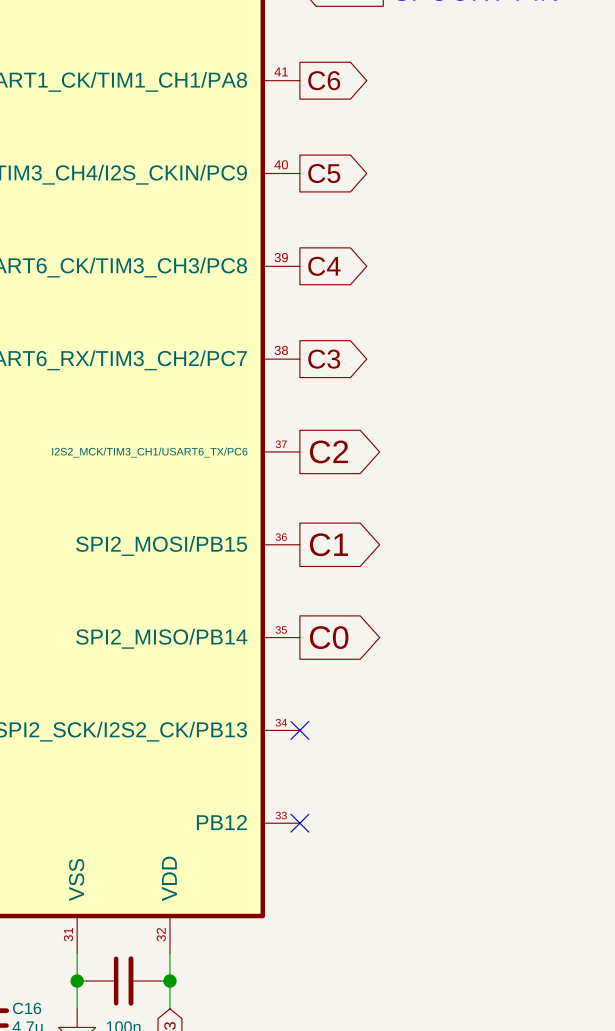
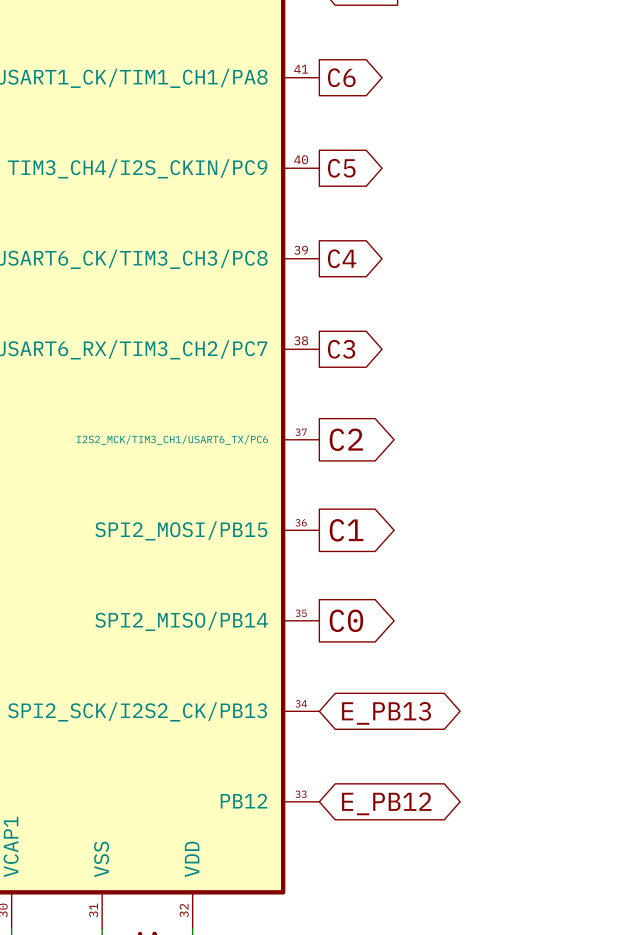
no-connect mark: (299, 730) -> none
global label: none -> E_PB13 (386, 713)
no-connect mark: (299, 823) -> none
global label: none -> E_PB12 (386, 803)

